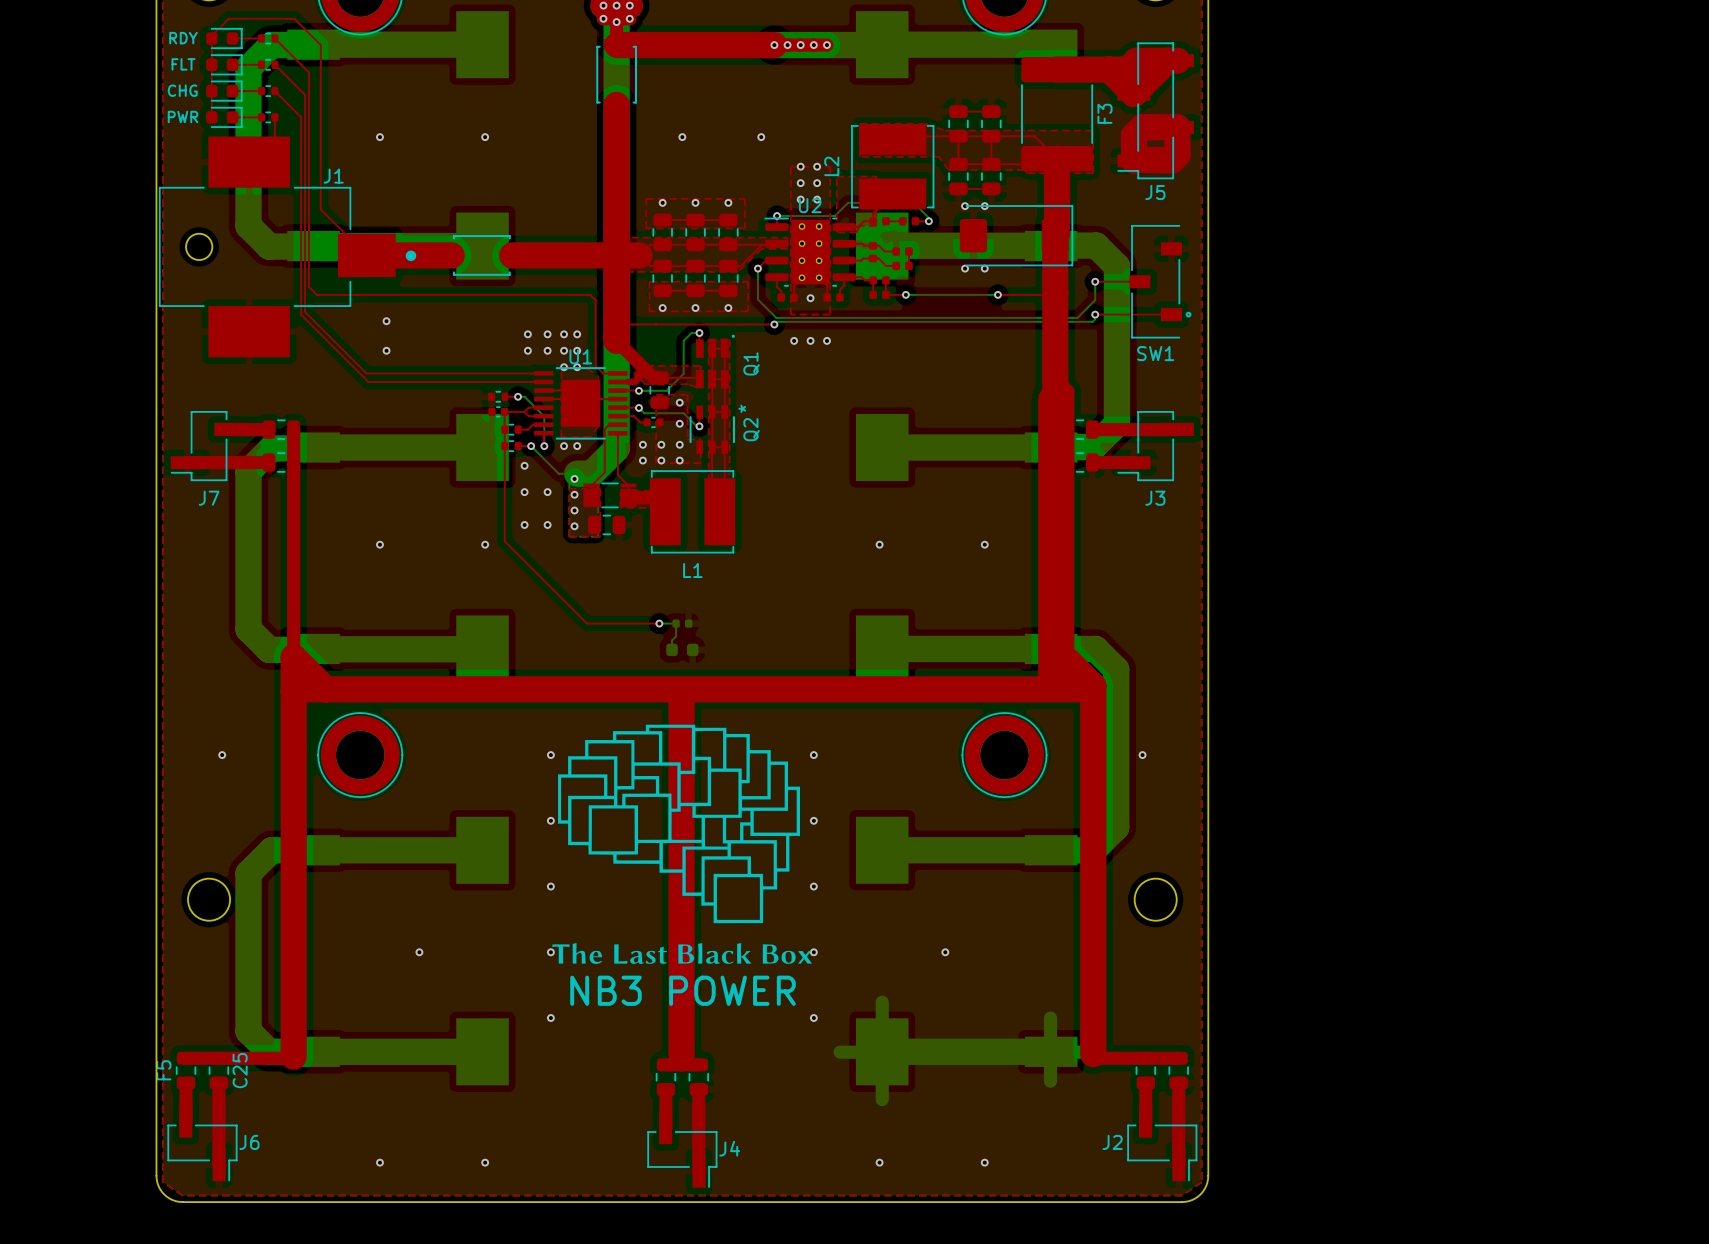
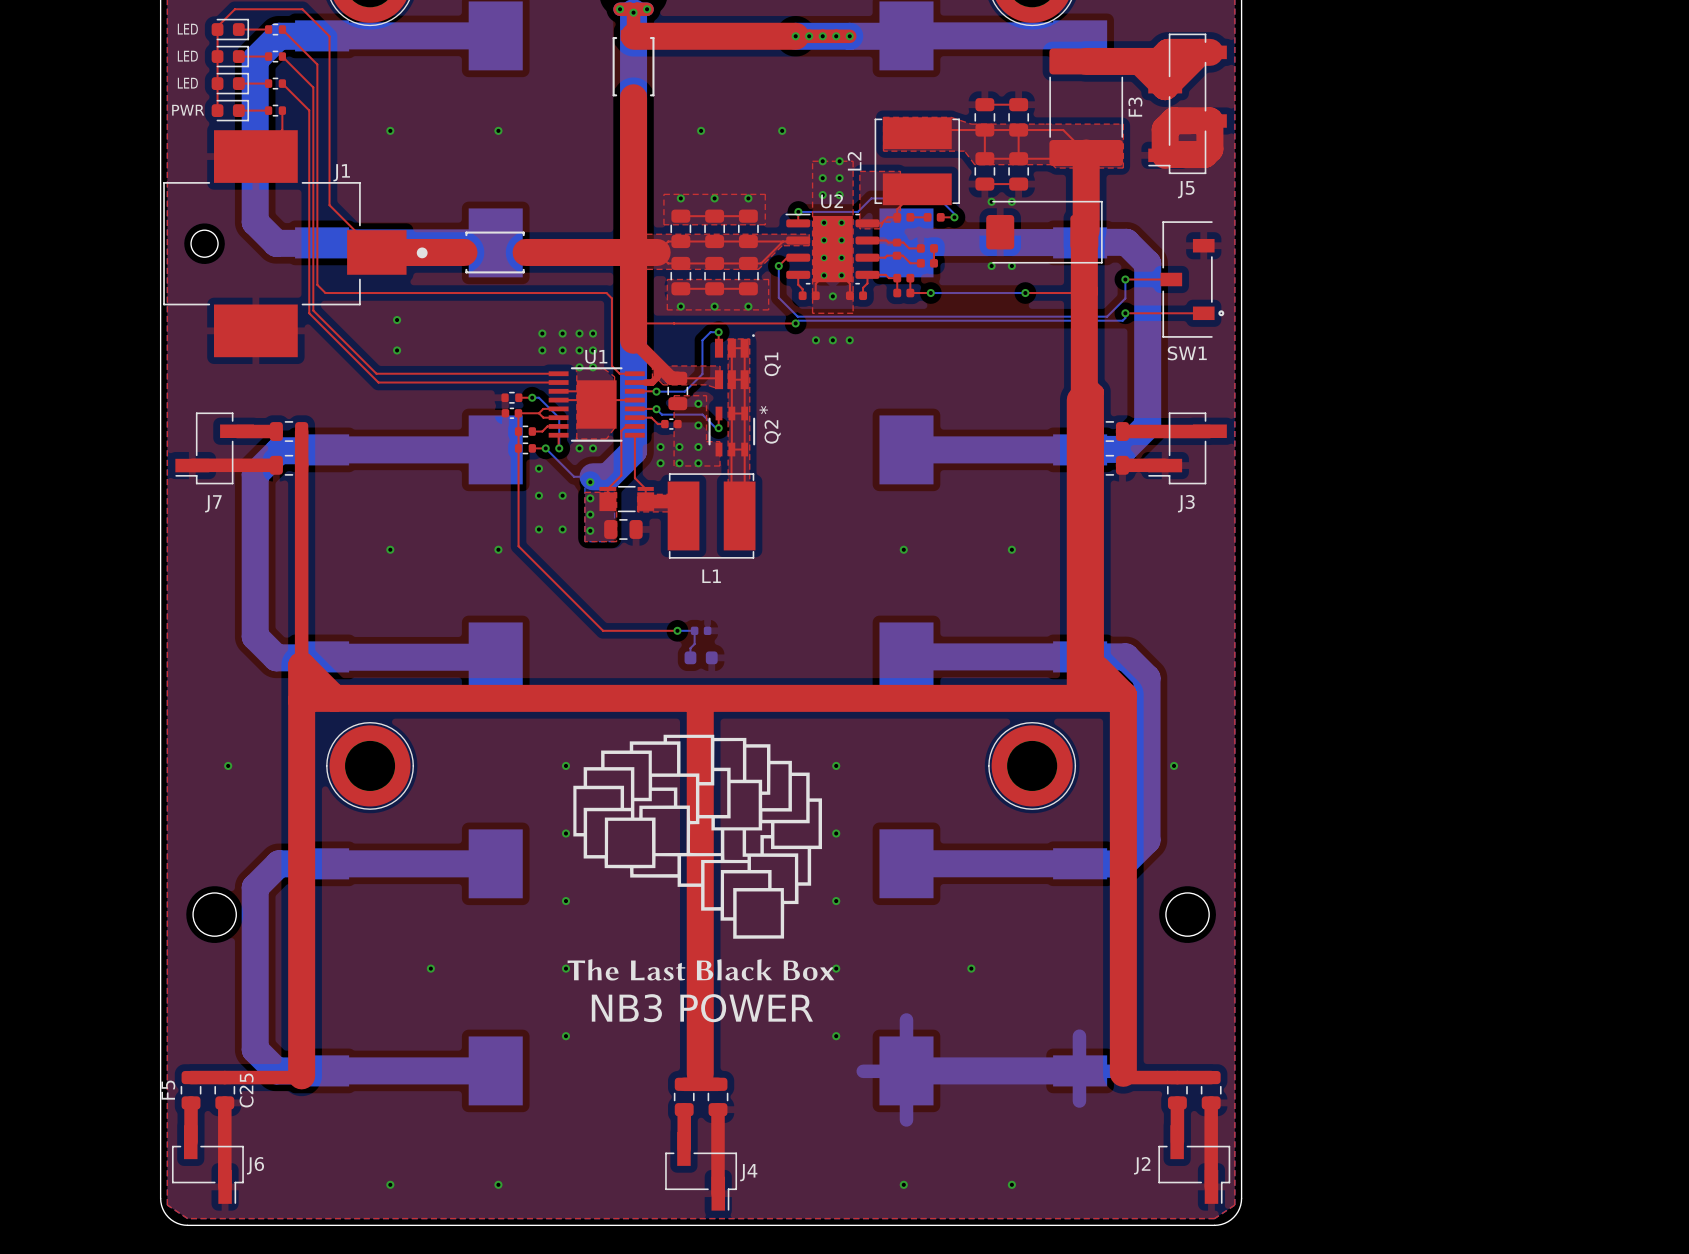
text: RDY (183, 38) -> LED (187, 29)
text: FLT (183, 64) -> LED (187, 56)
text: CHG (182, 90) -> LED (187, 83)

